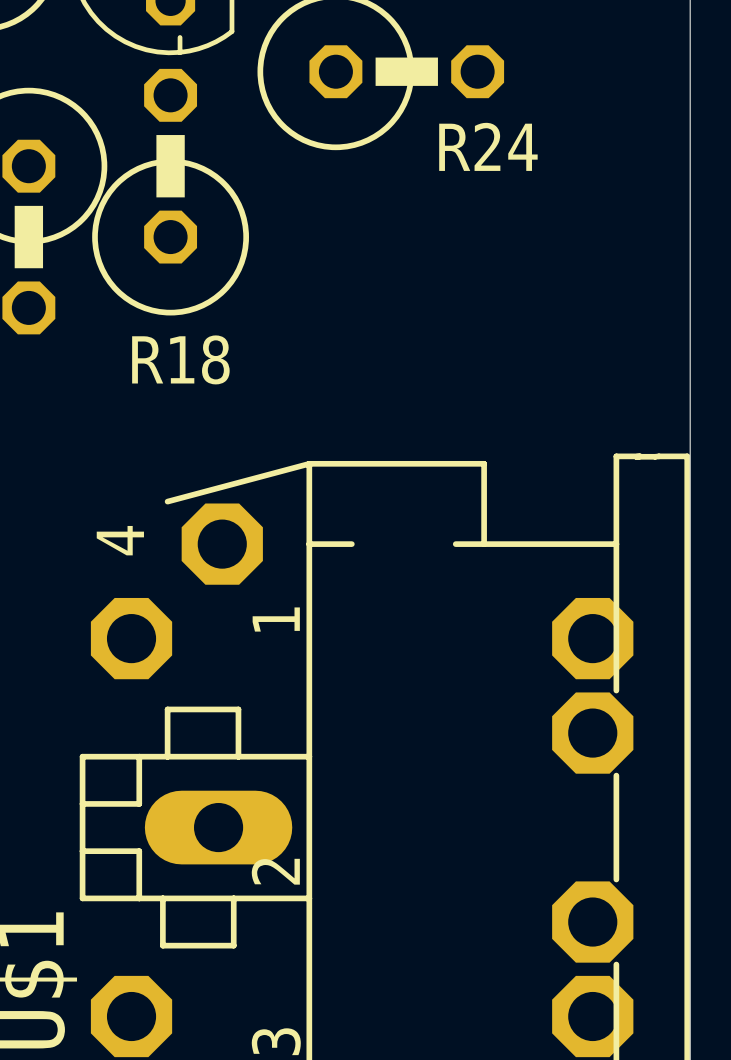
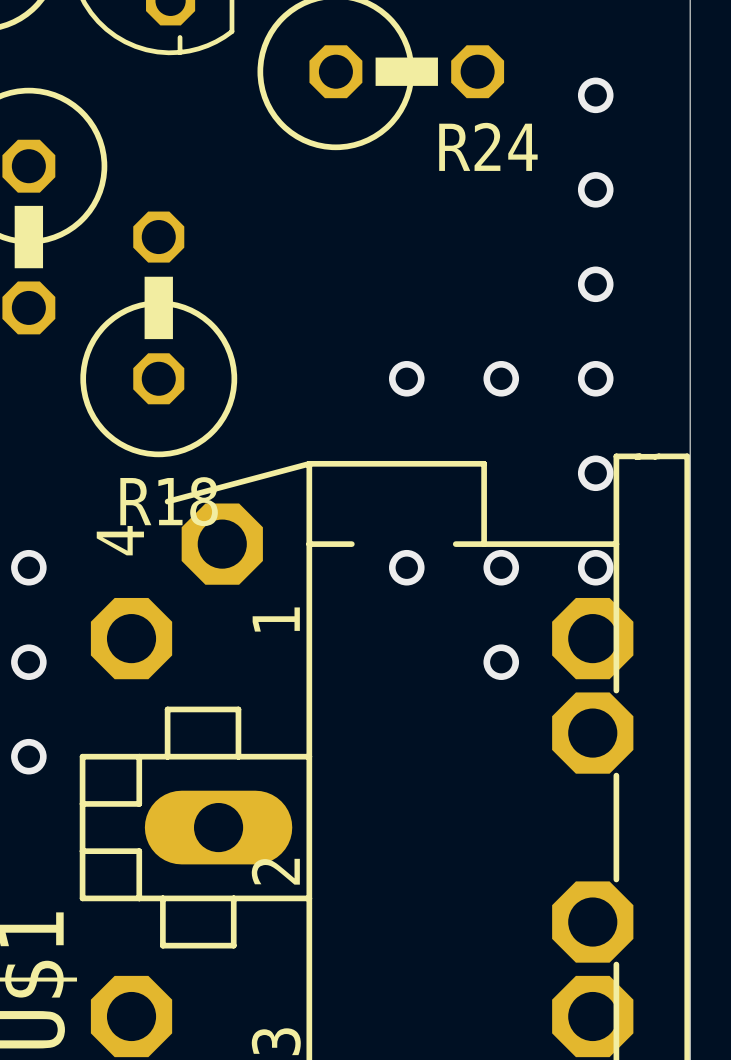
R18 footprint: [92, 68, 249, 316] -> [80, 211, 238, 458]
via: none -> (595, 95)
via: none -> (595, 189)
via: none -> (595, 284)
via: none -> (406, 378)
via: none -> (501, 378)
via: none -> (595, 378)
via: none -> (595, 473)
via: none -> (28, 567)
via: none -> (406, 567)
via: none -> (501, 567)
via: none -> (595, 567)
via: none -> (28, 662)
via: none -> (501, 662)
via: none -> (28, 756)

